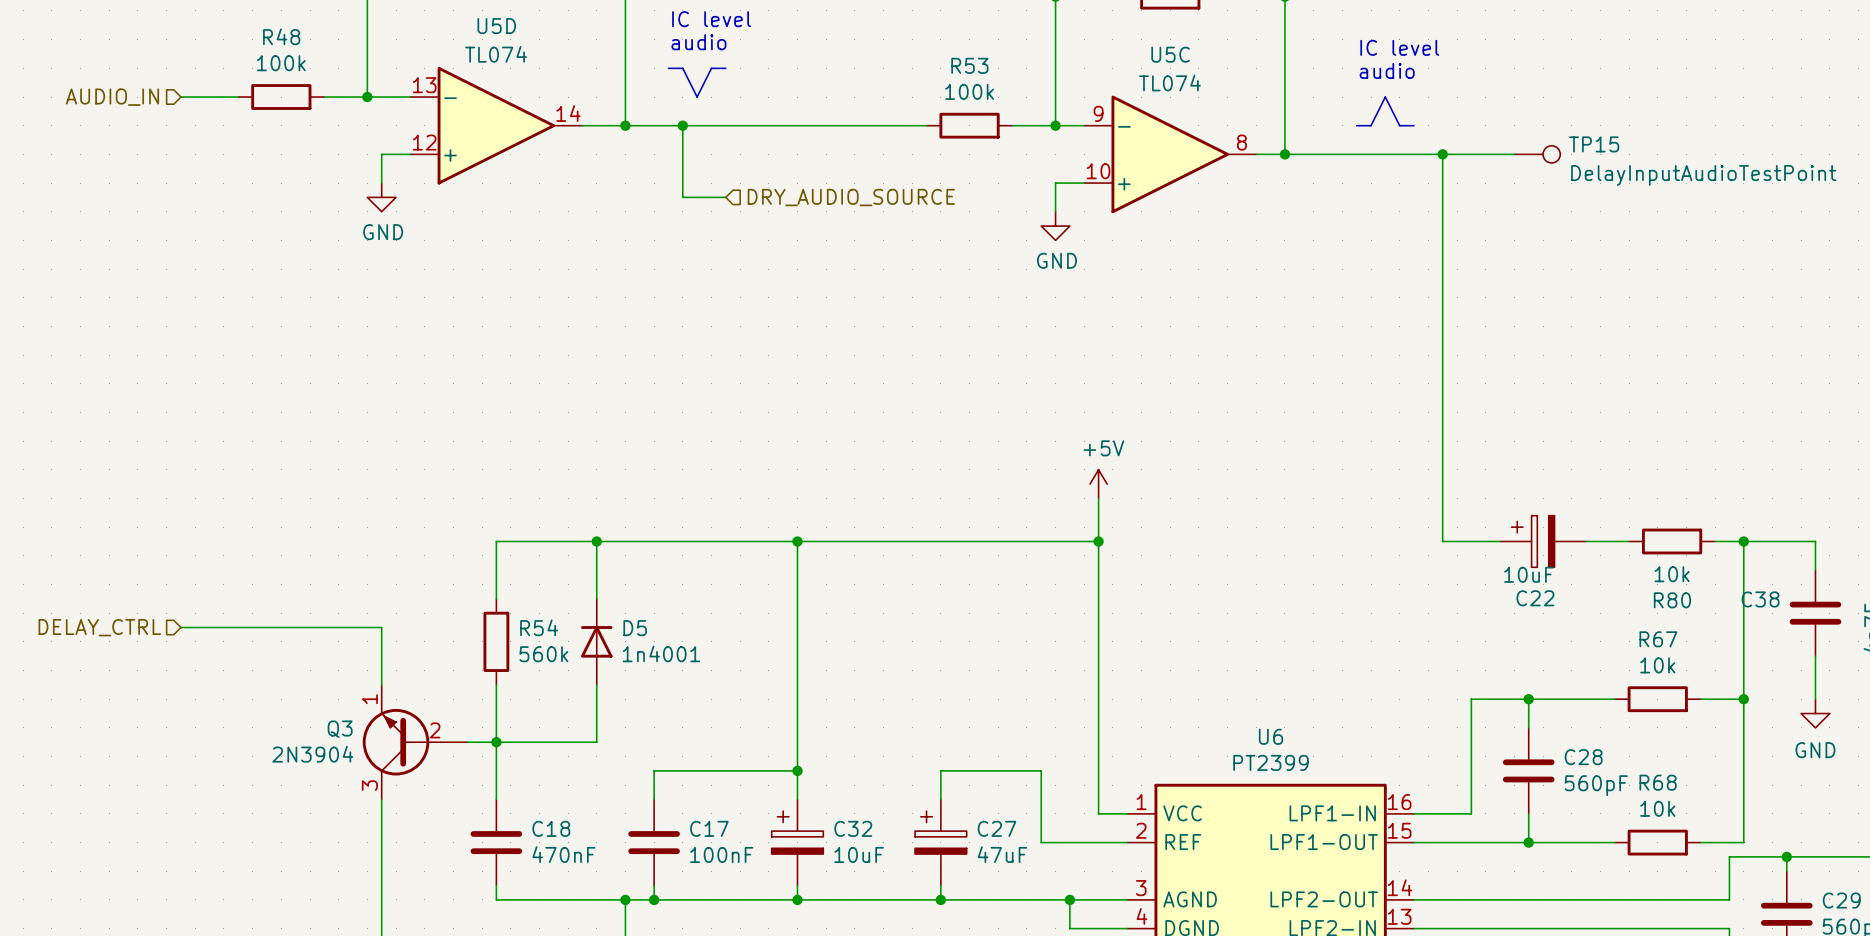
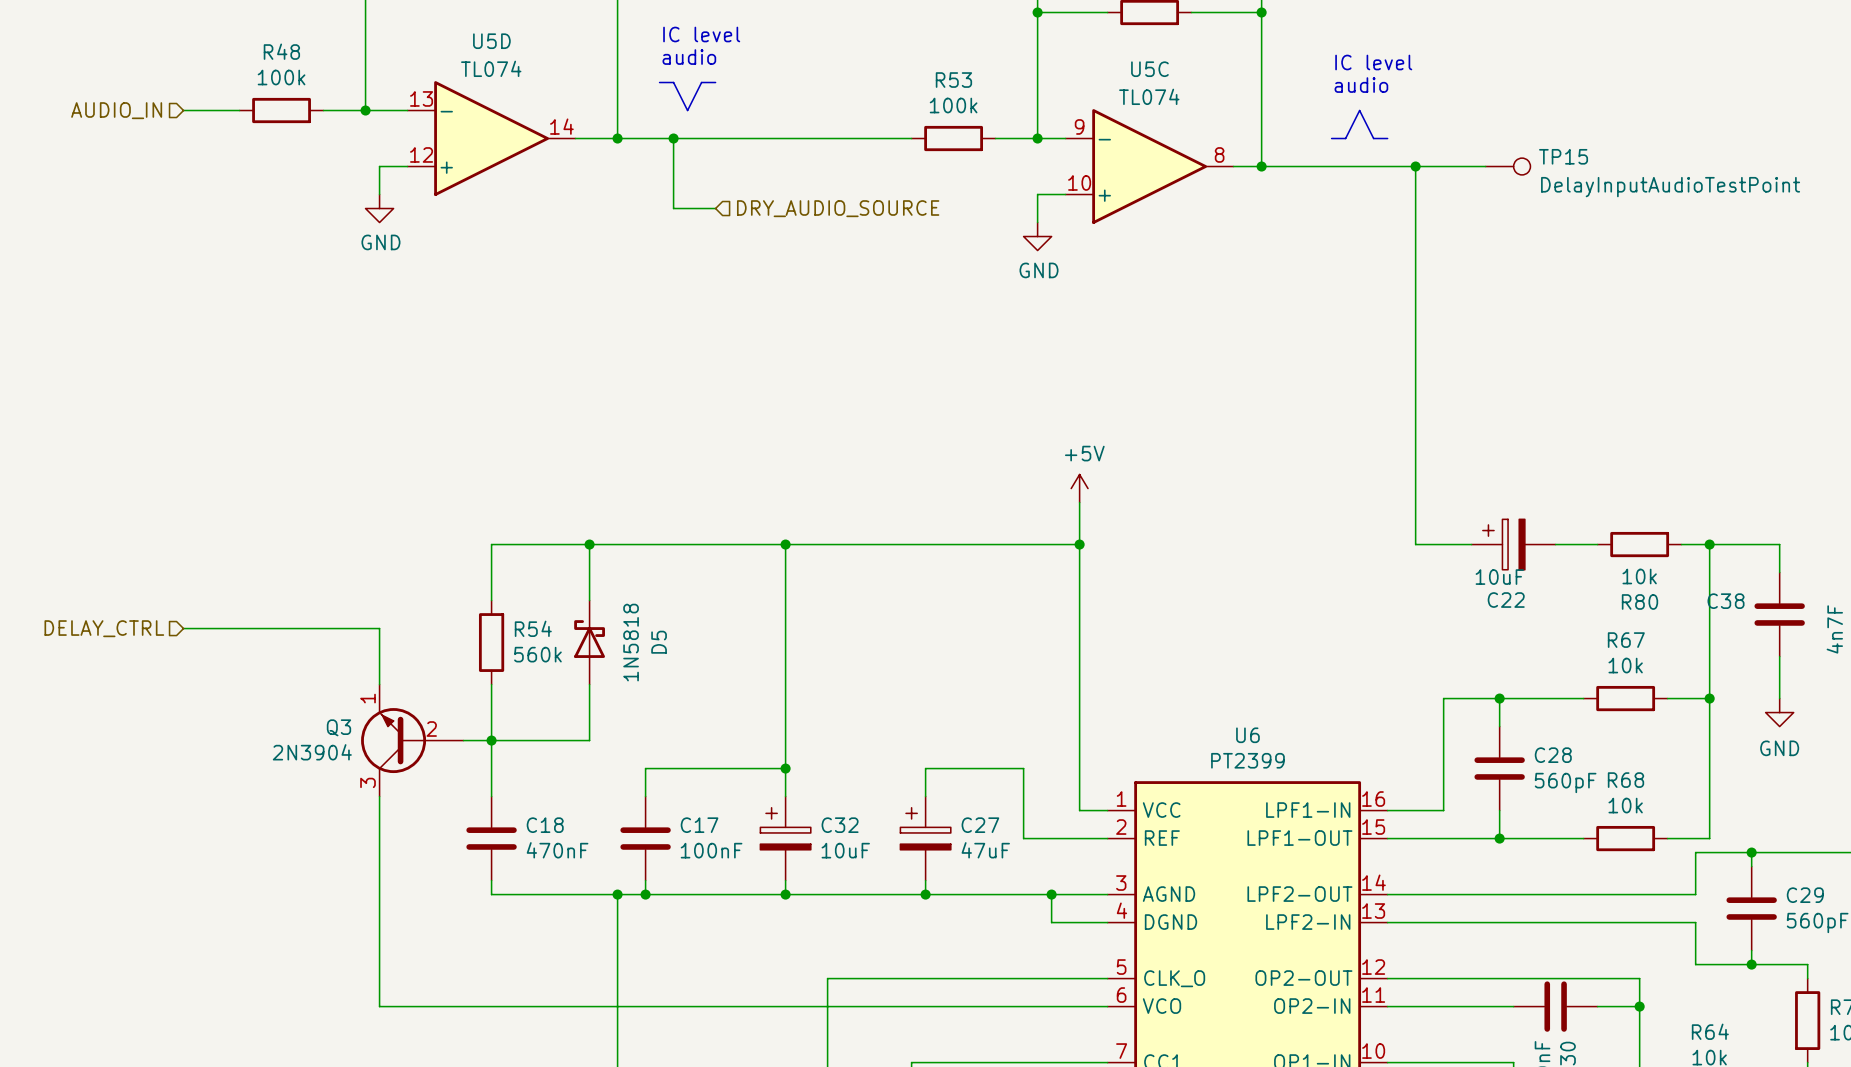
D5 symbol: [580, 598, 613, 685] -> [574, 600, 605, 685]
D5 name rotation: 0° (635, 628) -> 90° counterclockwise (659, 642)
D5 value: 1n4001 (661, 653) -> 1N5818 (631, 642)

